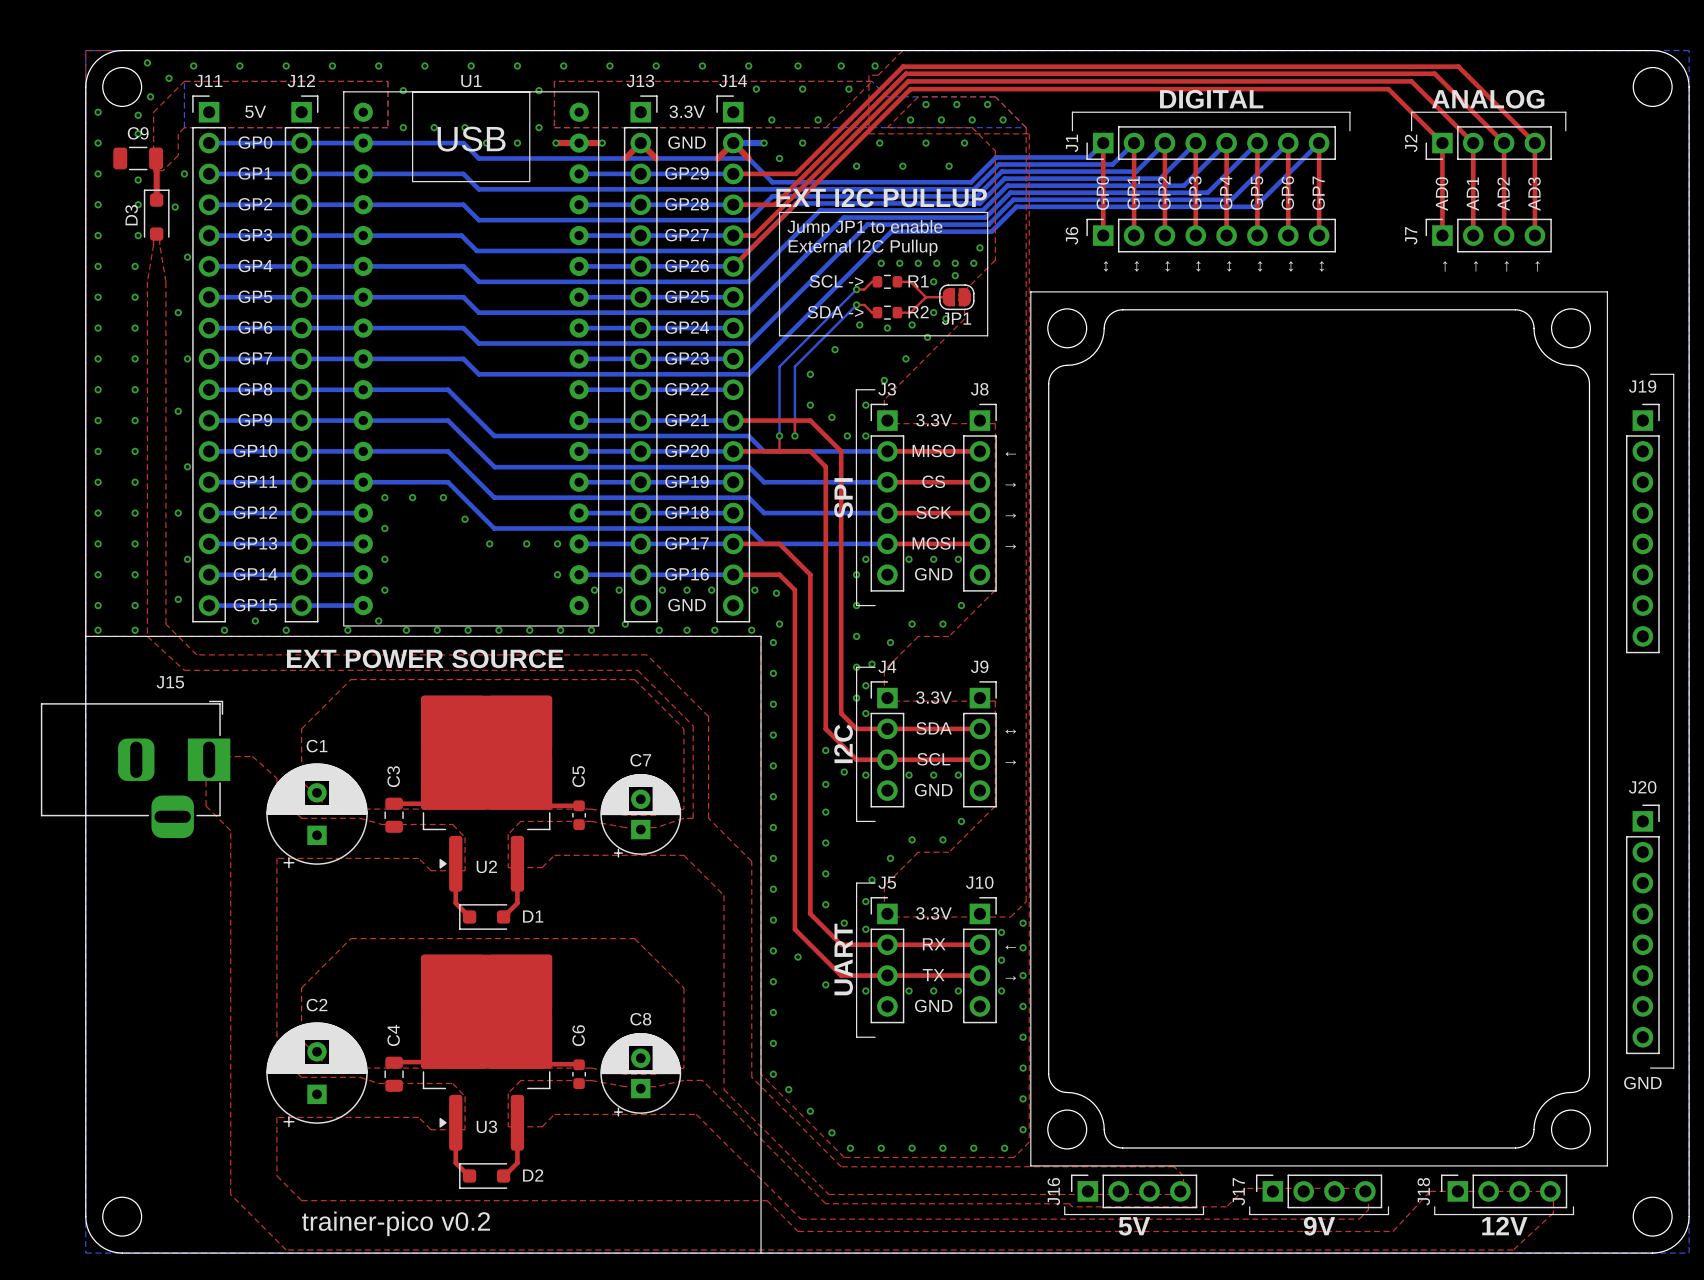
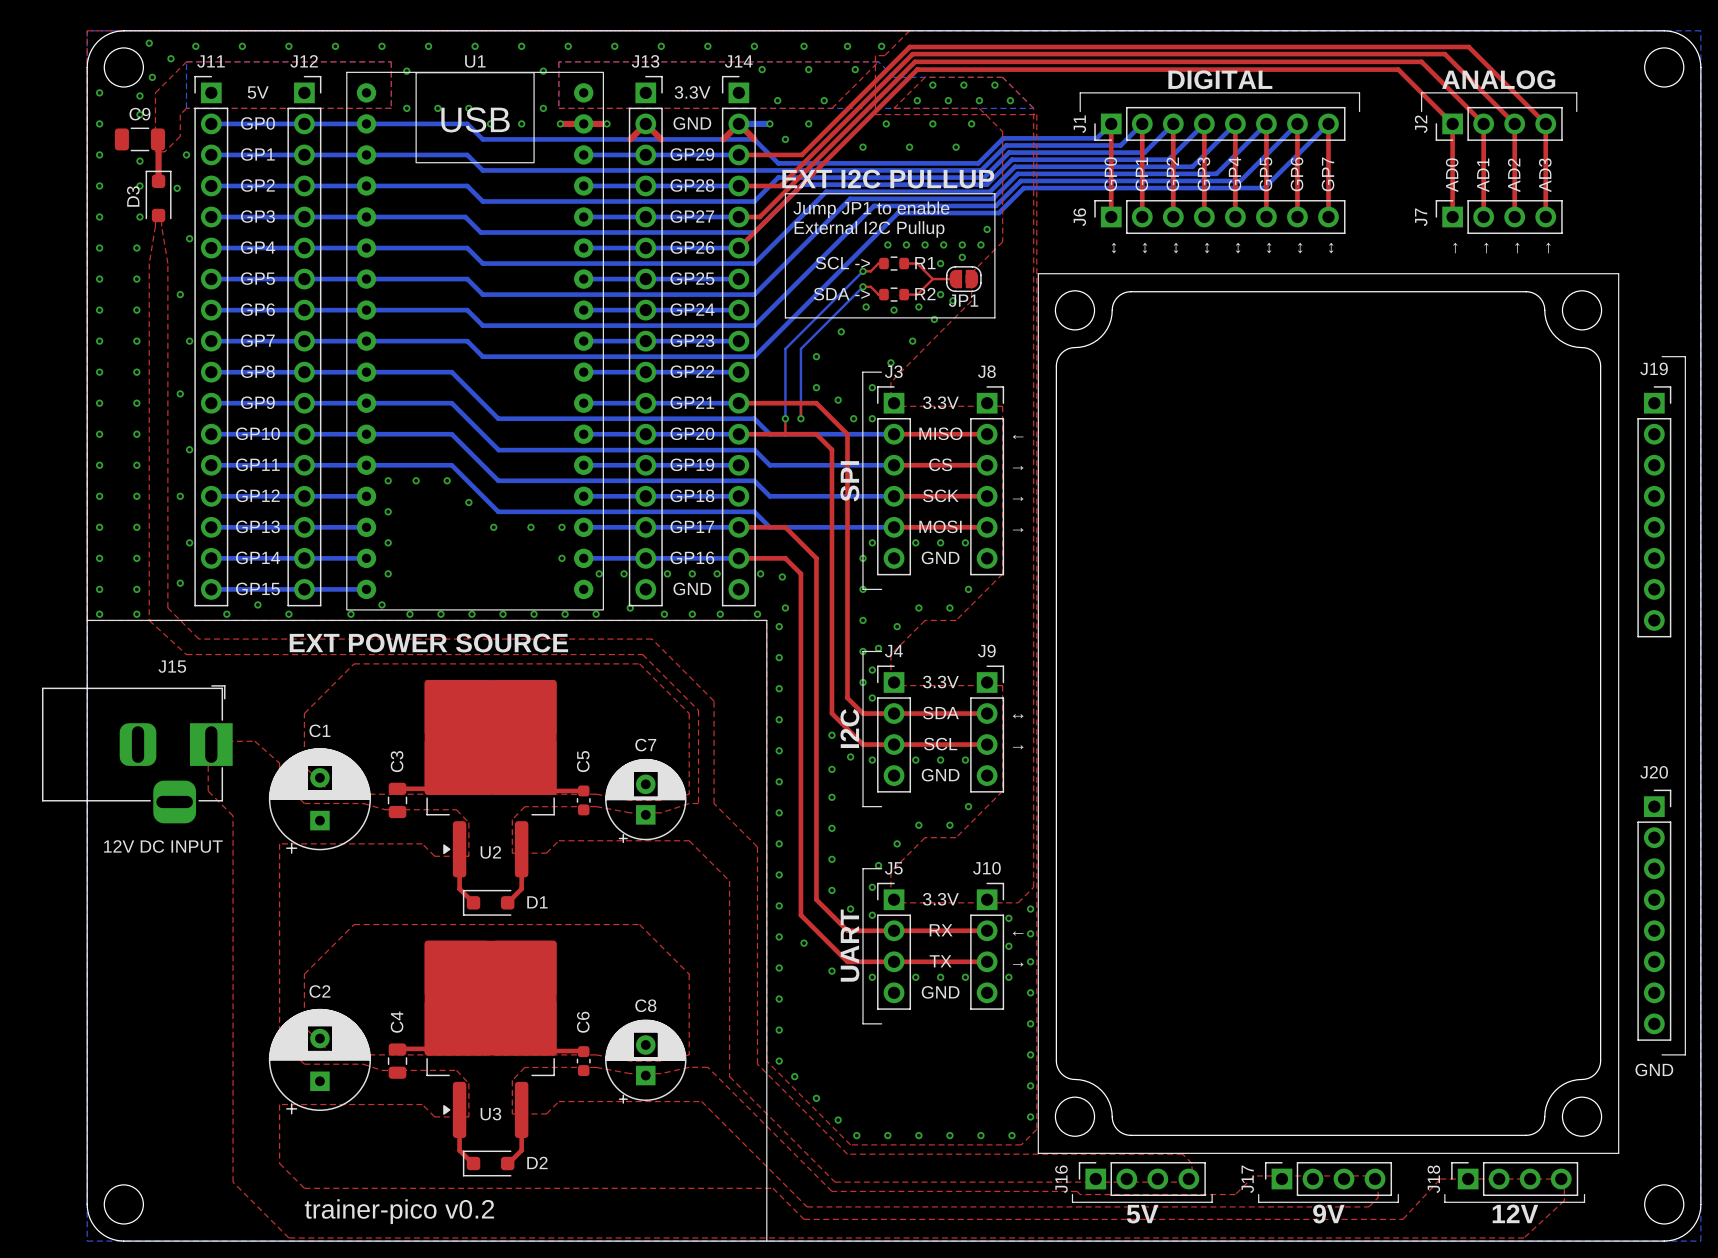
text: none -> 12V DC INPUT (163, 846)

